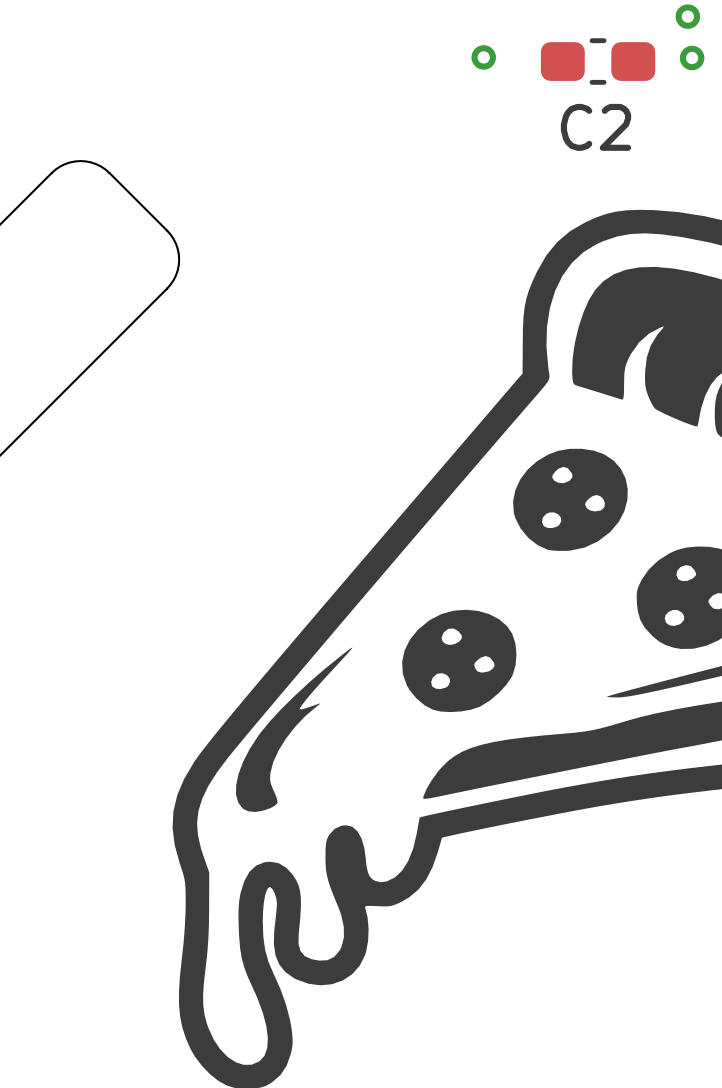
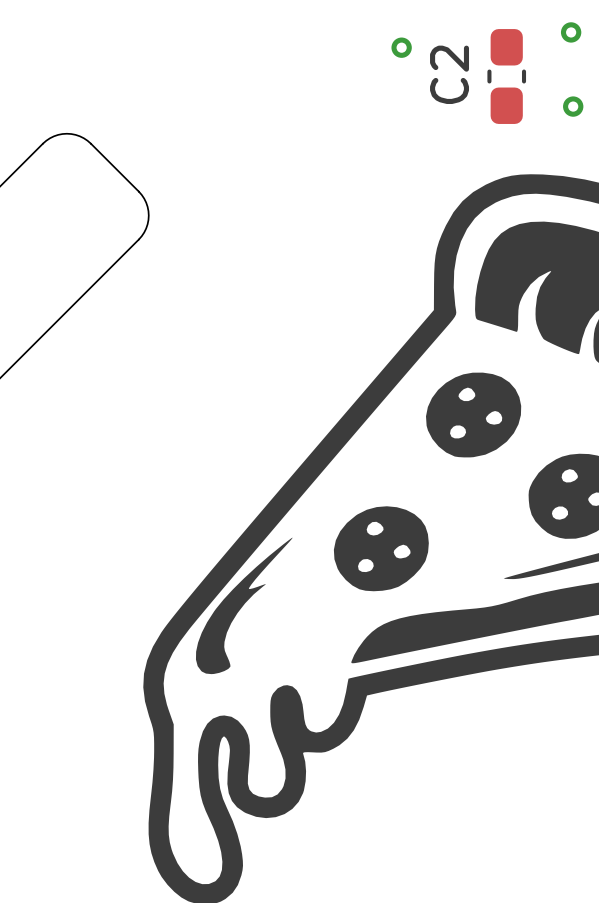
via: (687, 16) -> none
via: none -> (571, 32)
via: (692, 58) -> none
C2 rotation: 0° (598, 61) -> 90° clockwise (506, 76)
via: none -> (573, 106)

